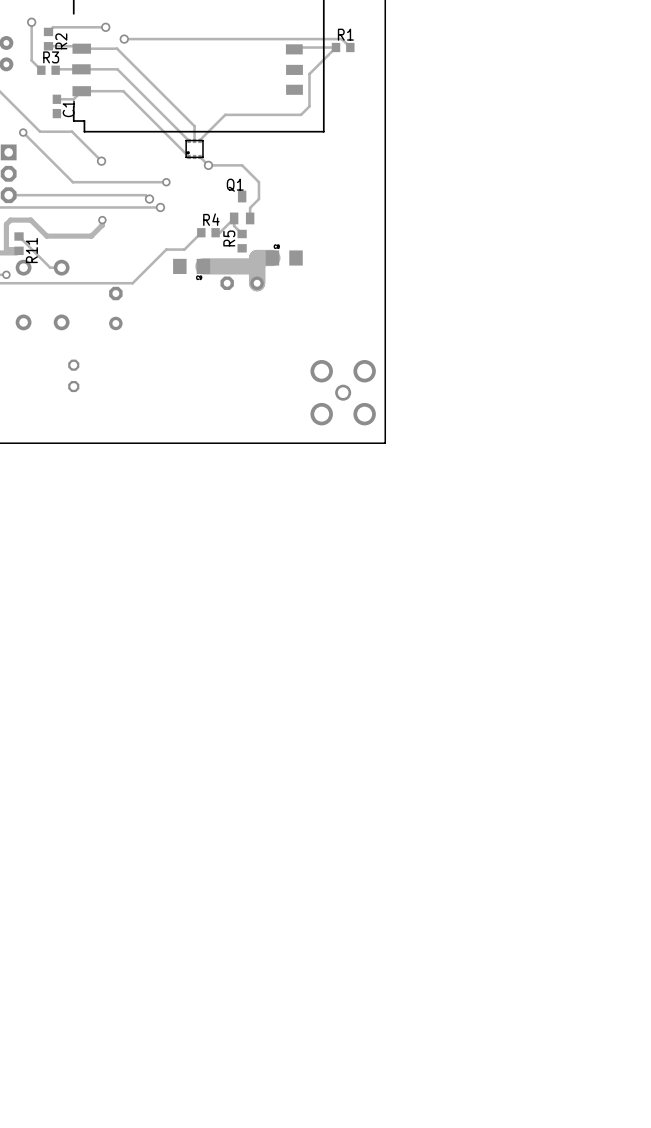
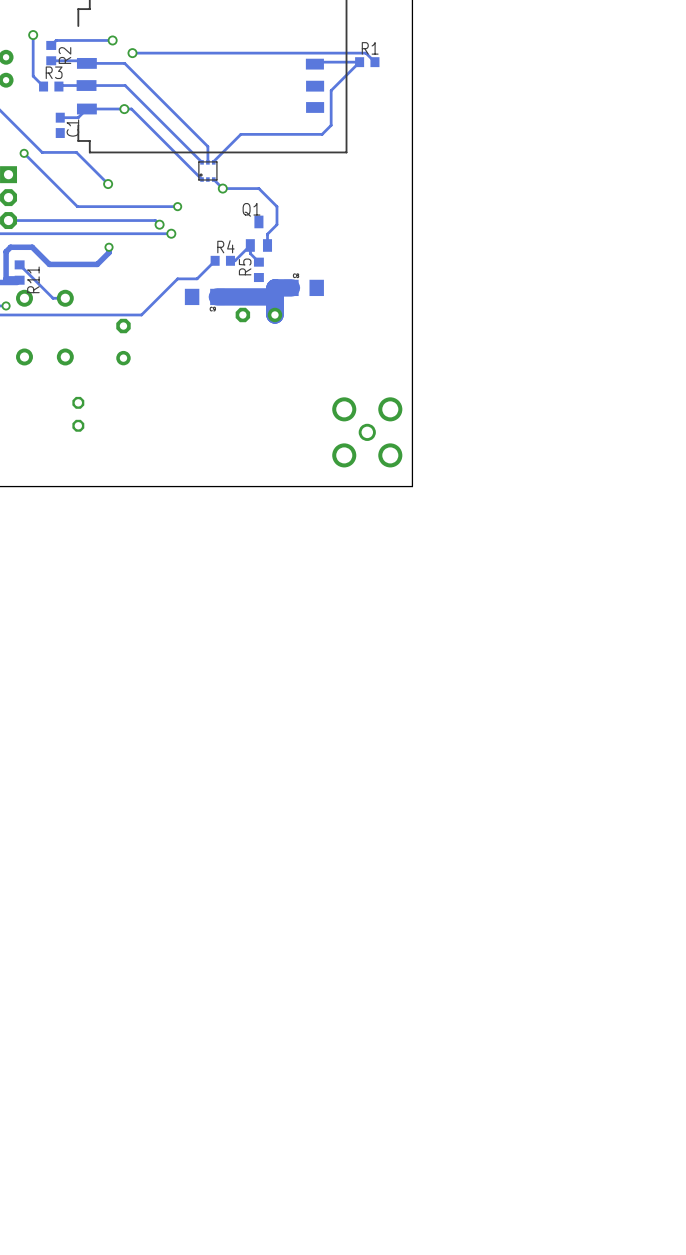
via: none -> (124, 109)

